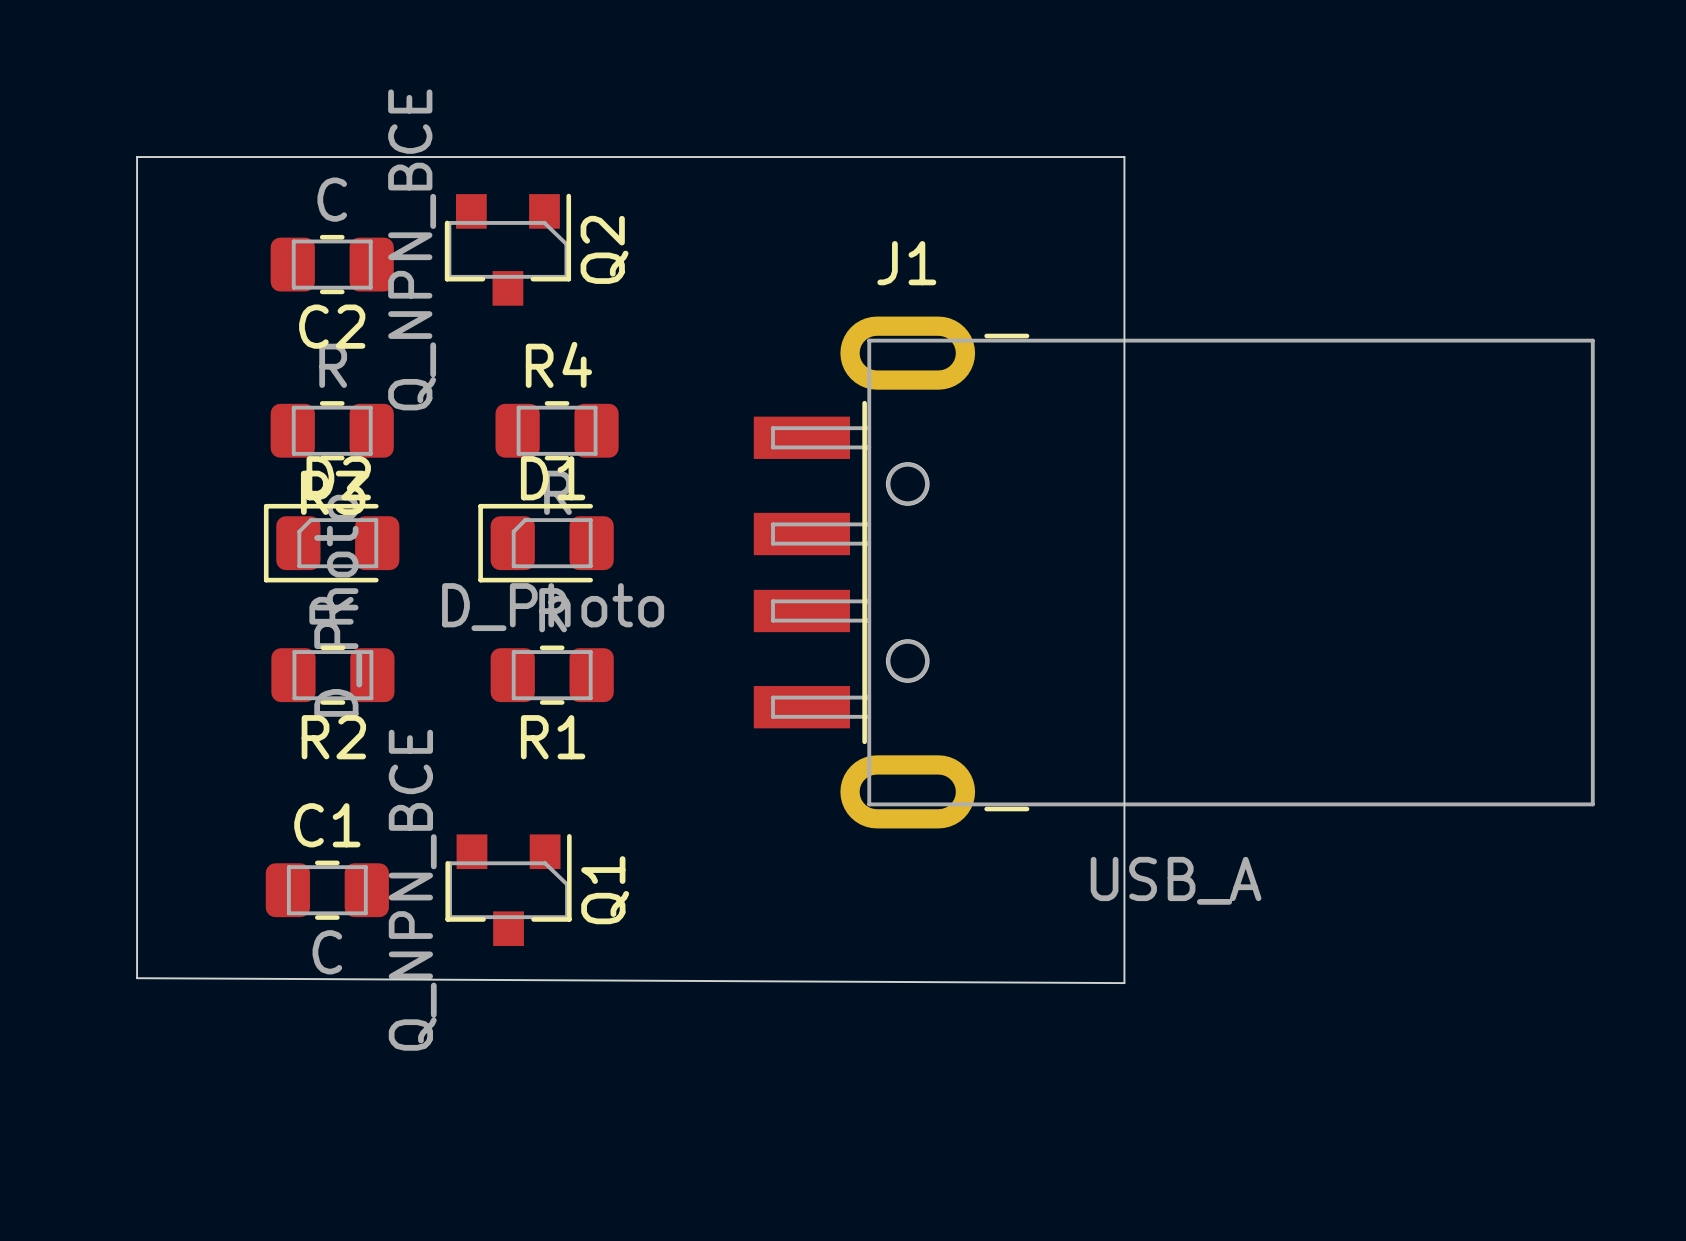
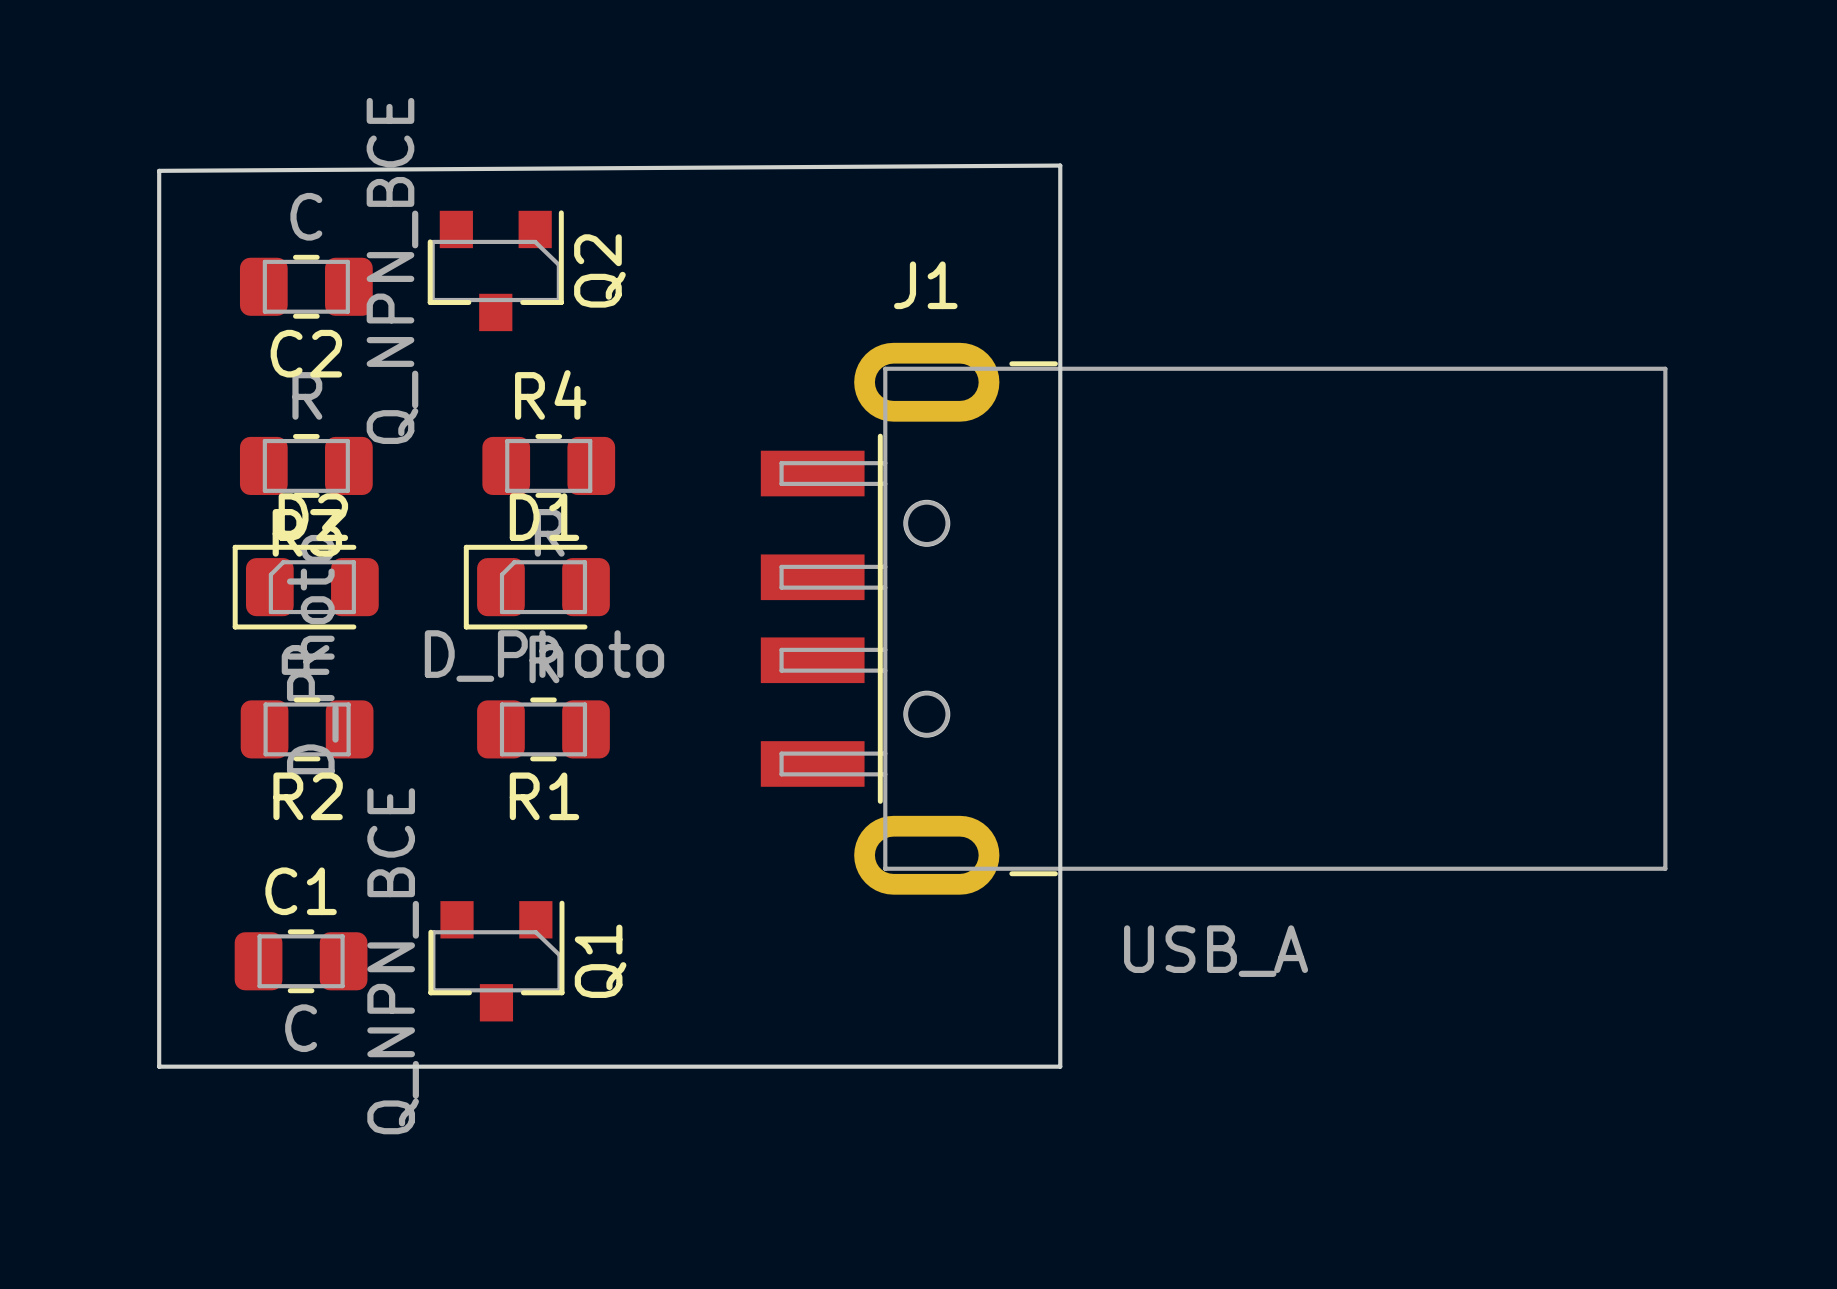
board edge: (137, 157) (1124, 157) (1124, 983) (137, 978) (137, 157) -> (1060, 165) (159, 170) (159, 1066) (1060, 1066) (1060, 165)

